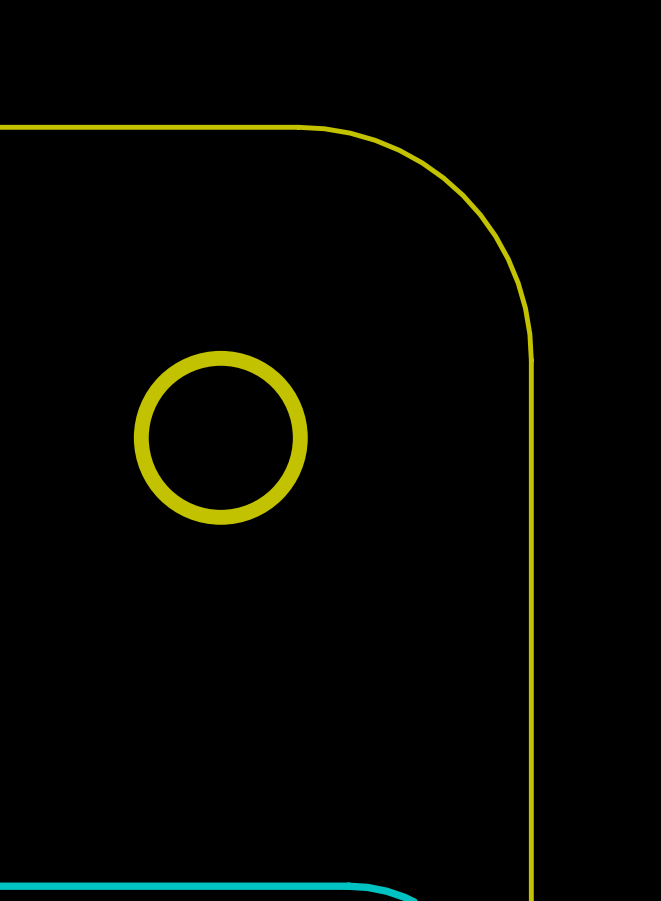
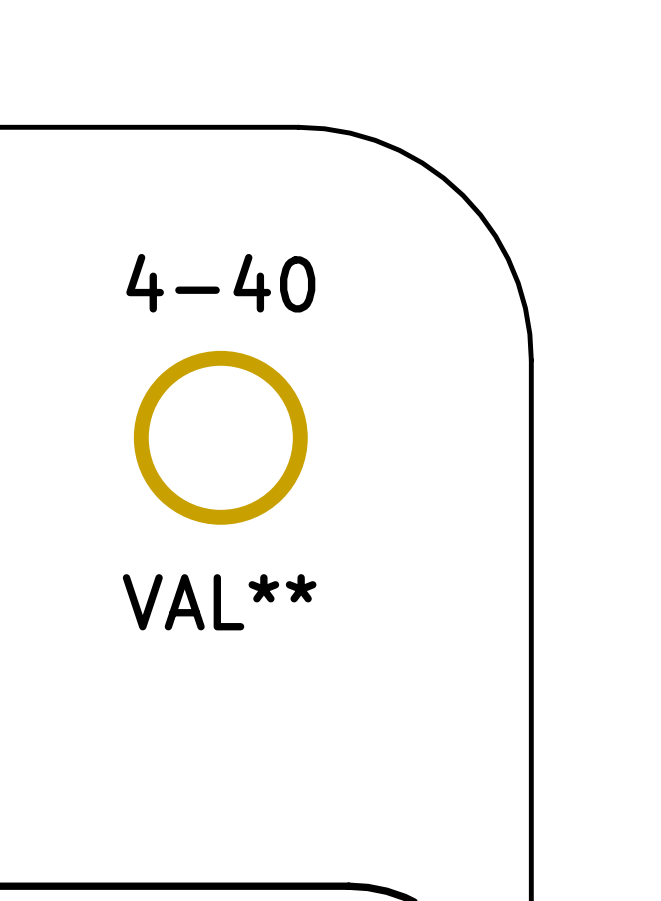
4-40 name: none -> 4-40 (220, 283)
4-40 value: none -> VAL** (219, 602)

